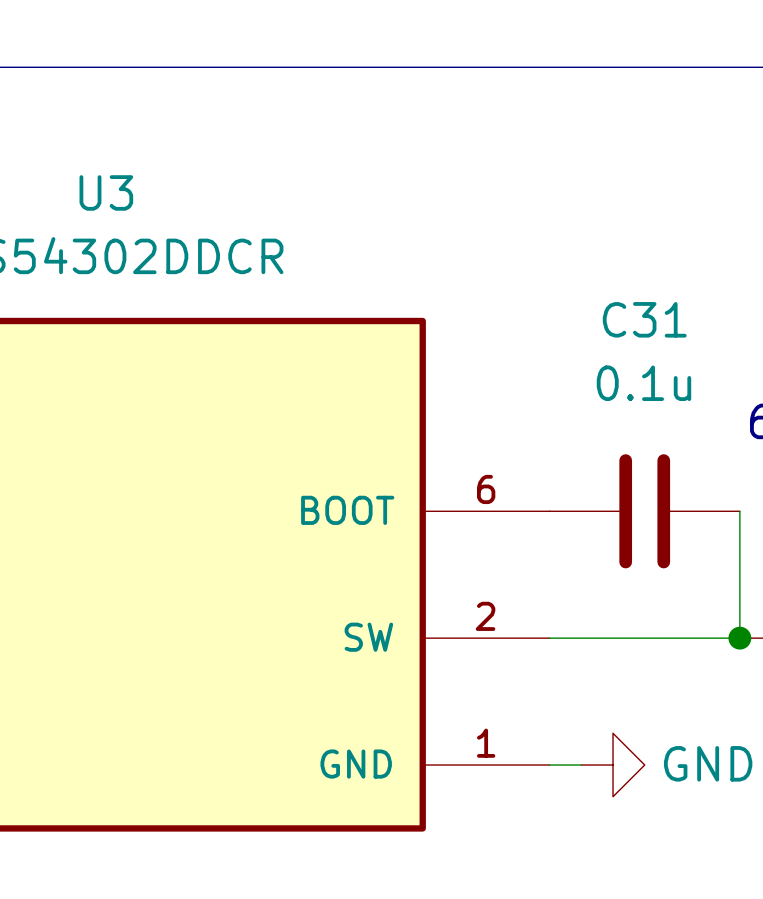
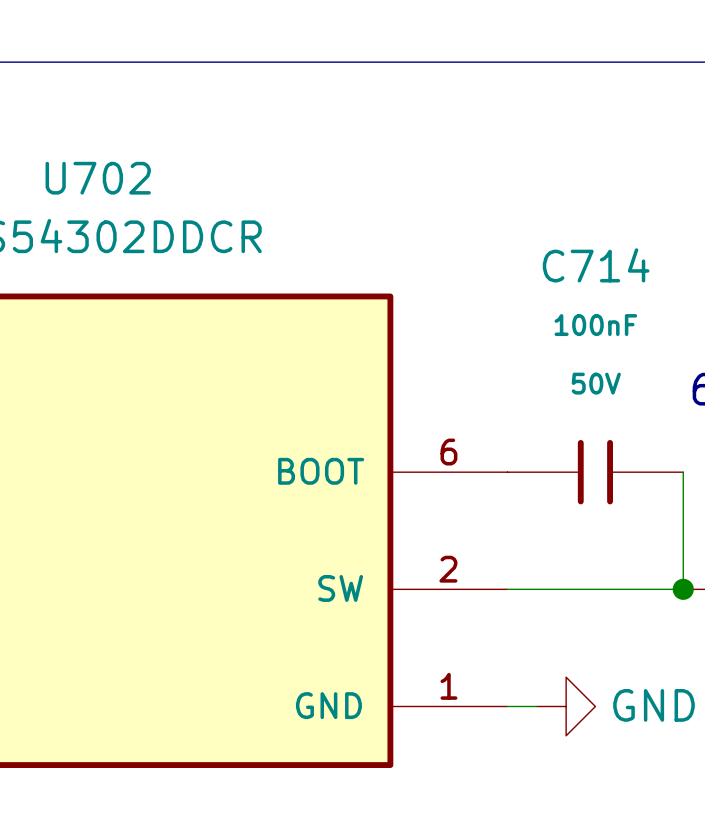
U3 name: U3 (106, 192) -> U702 (98, 178)
C31: 0.1u (644, 511) -> none
C714: none -> 100nF (595, 472)

